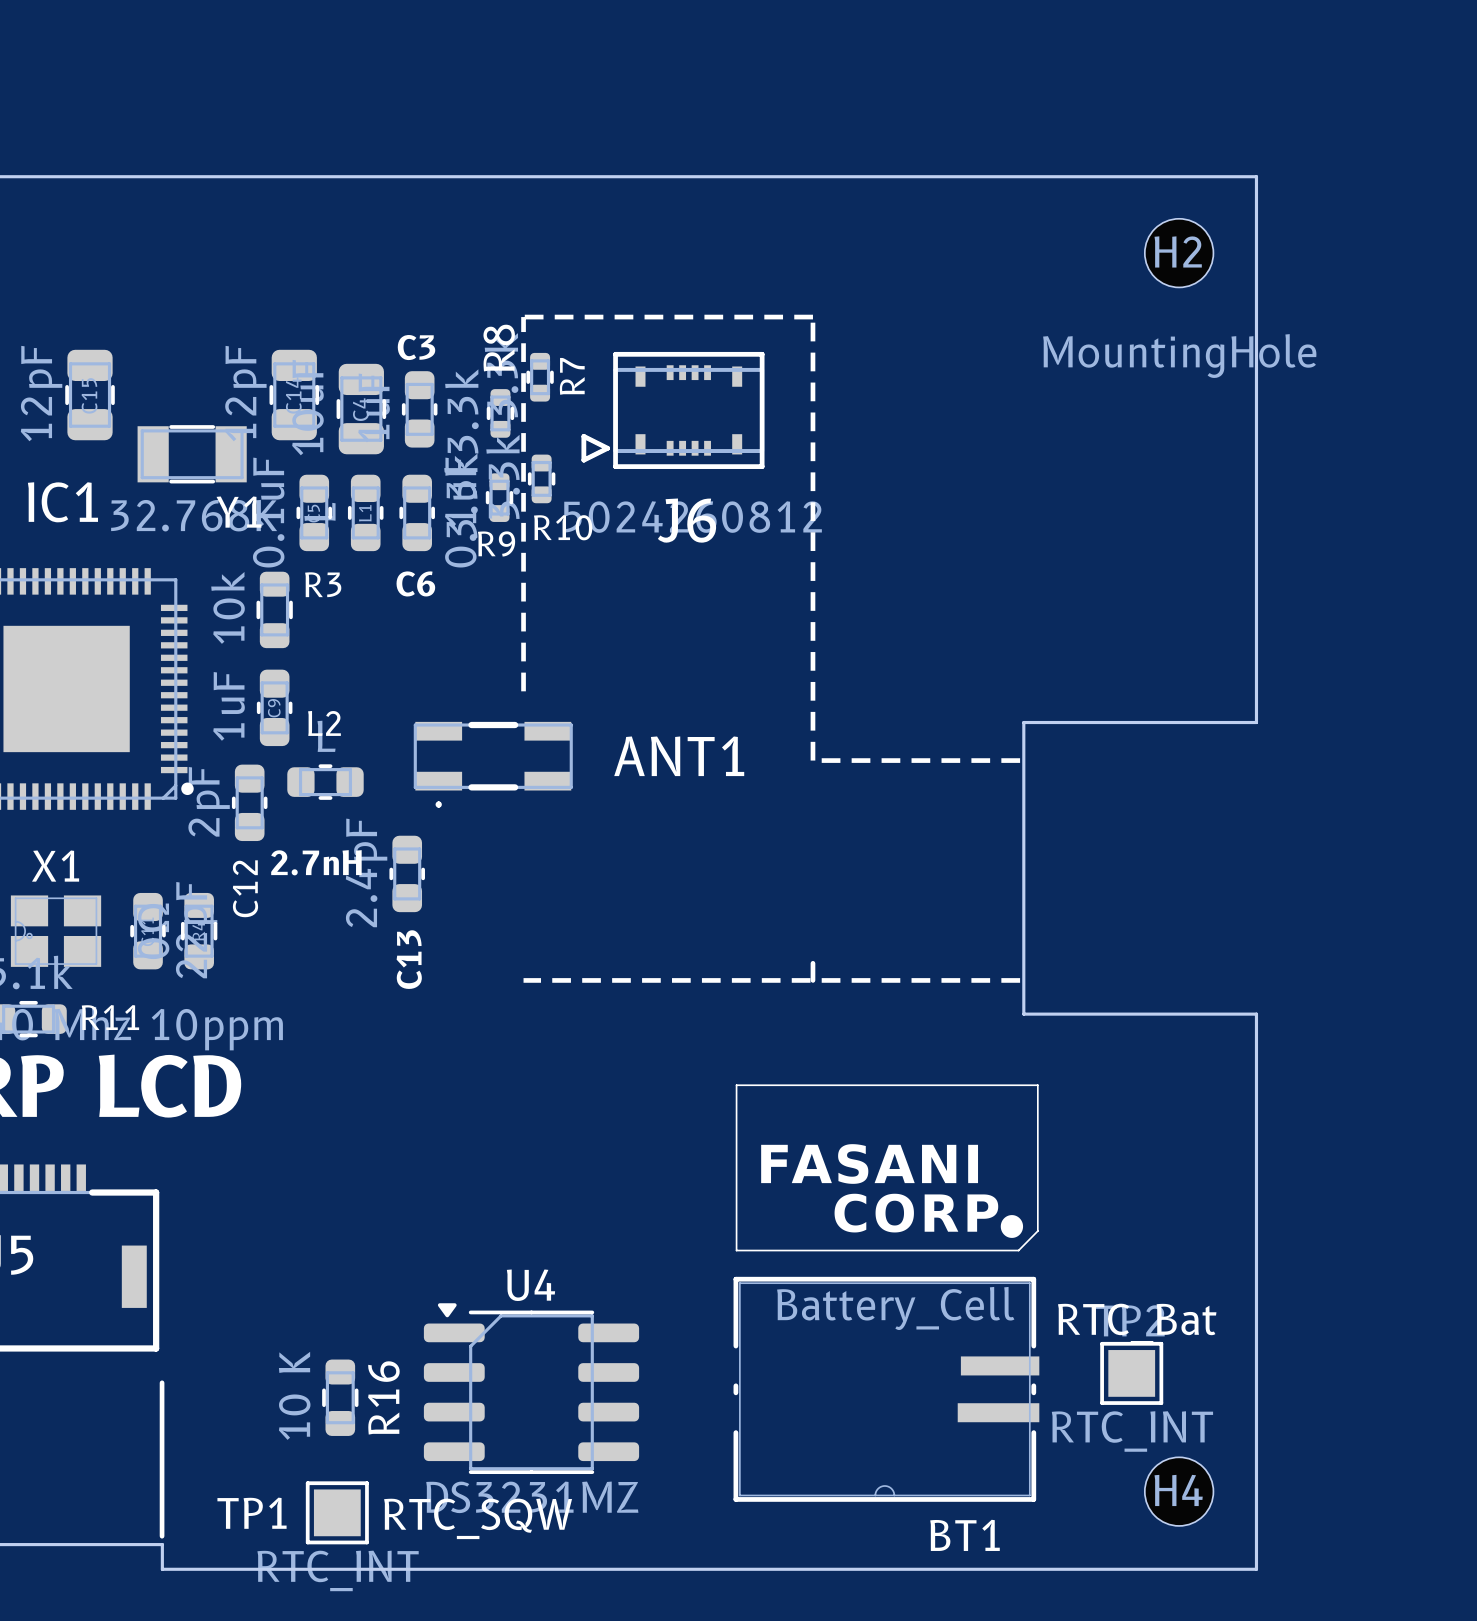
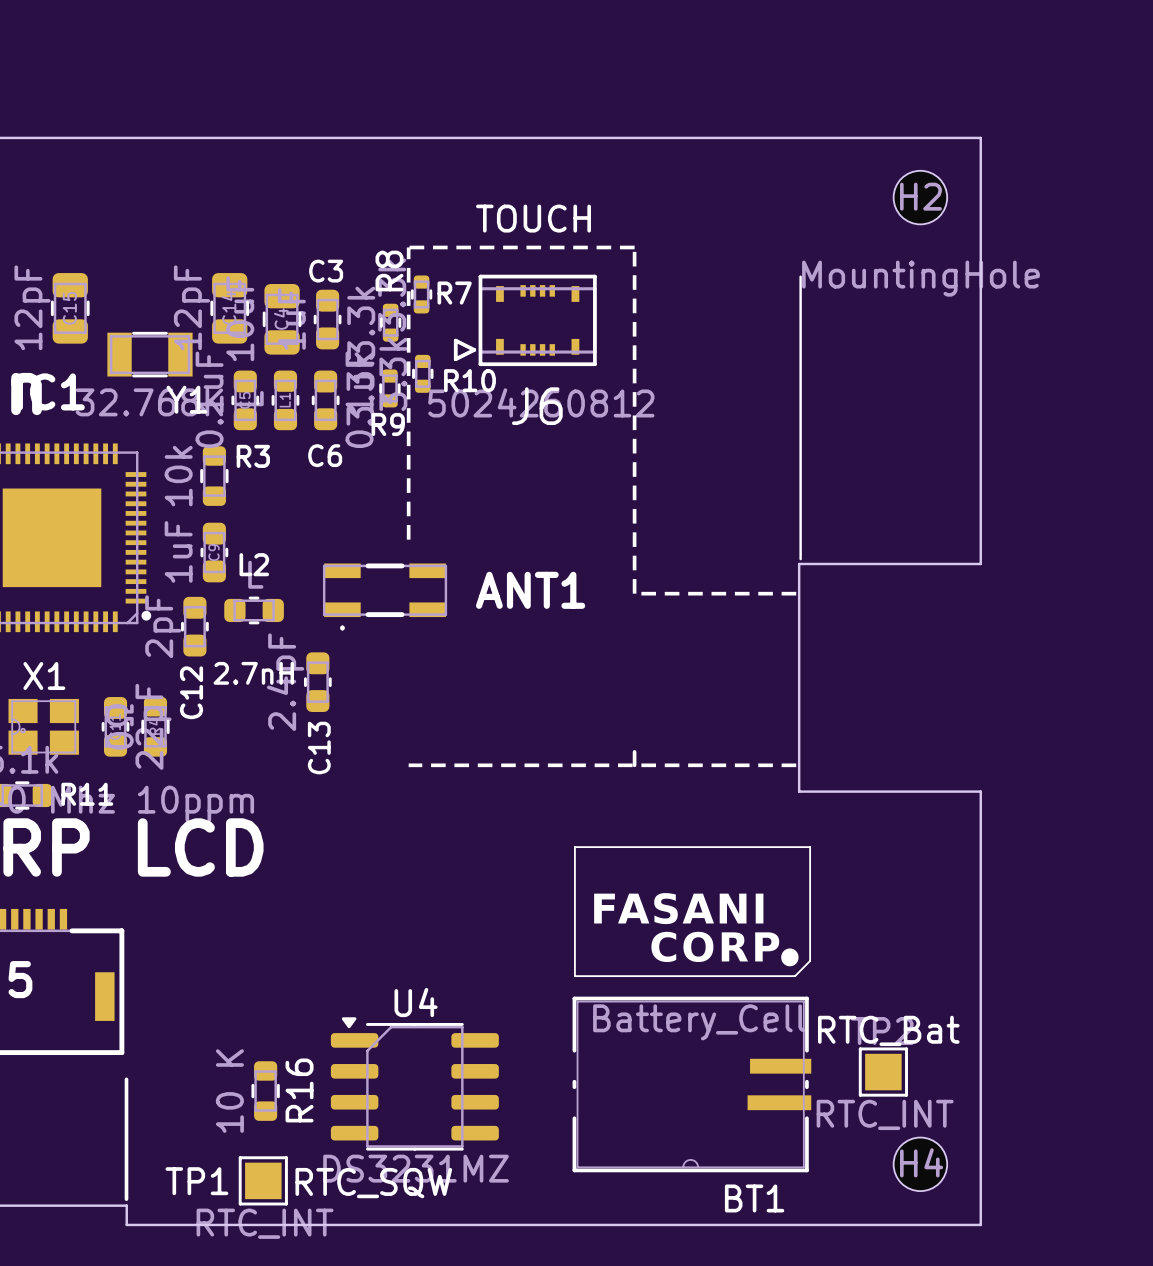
text: none -> TOUCH (533, 218)
line: none -> (800, 276) (800, 559)
R7 name rotation: 0° (572, 376) -> 90° clockwise (454, 293)
R10 name position: R10 (563, 527) -> R10 (469, 380)

